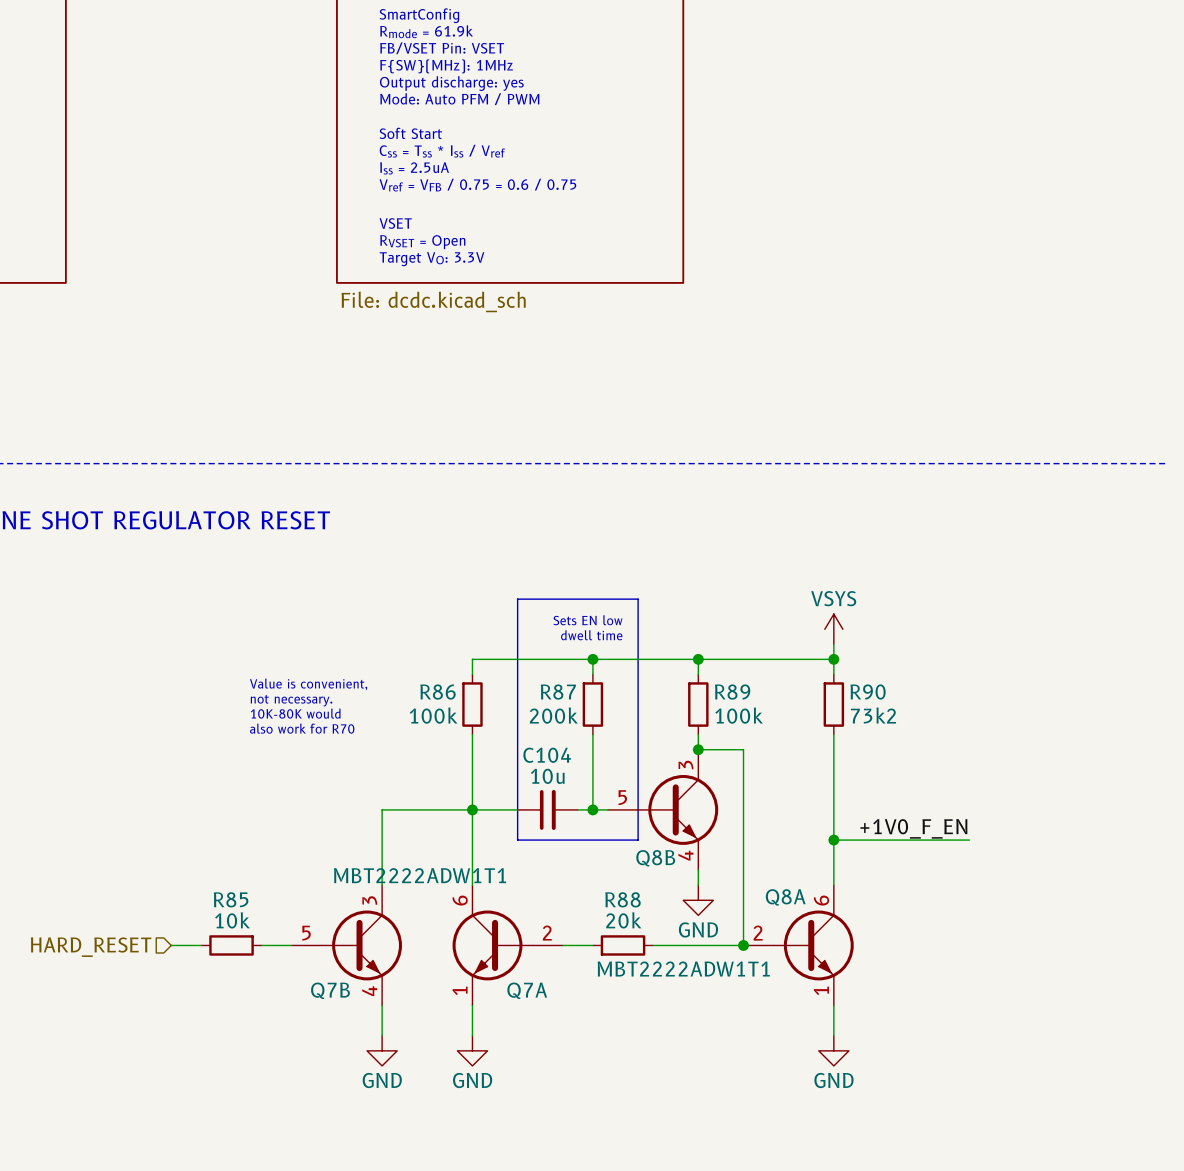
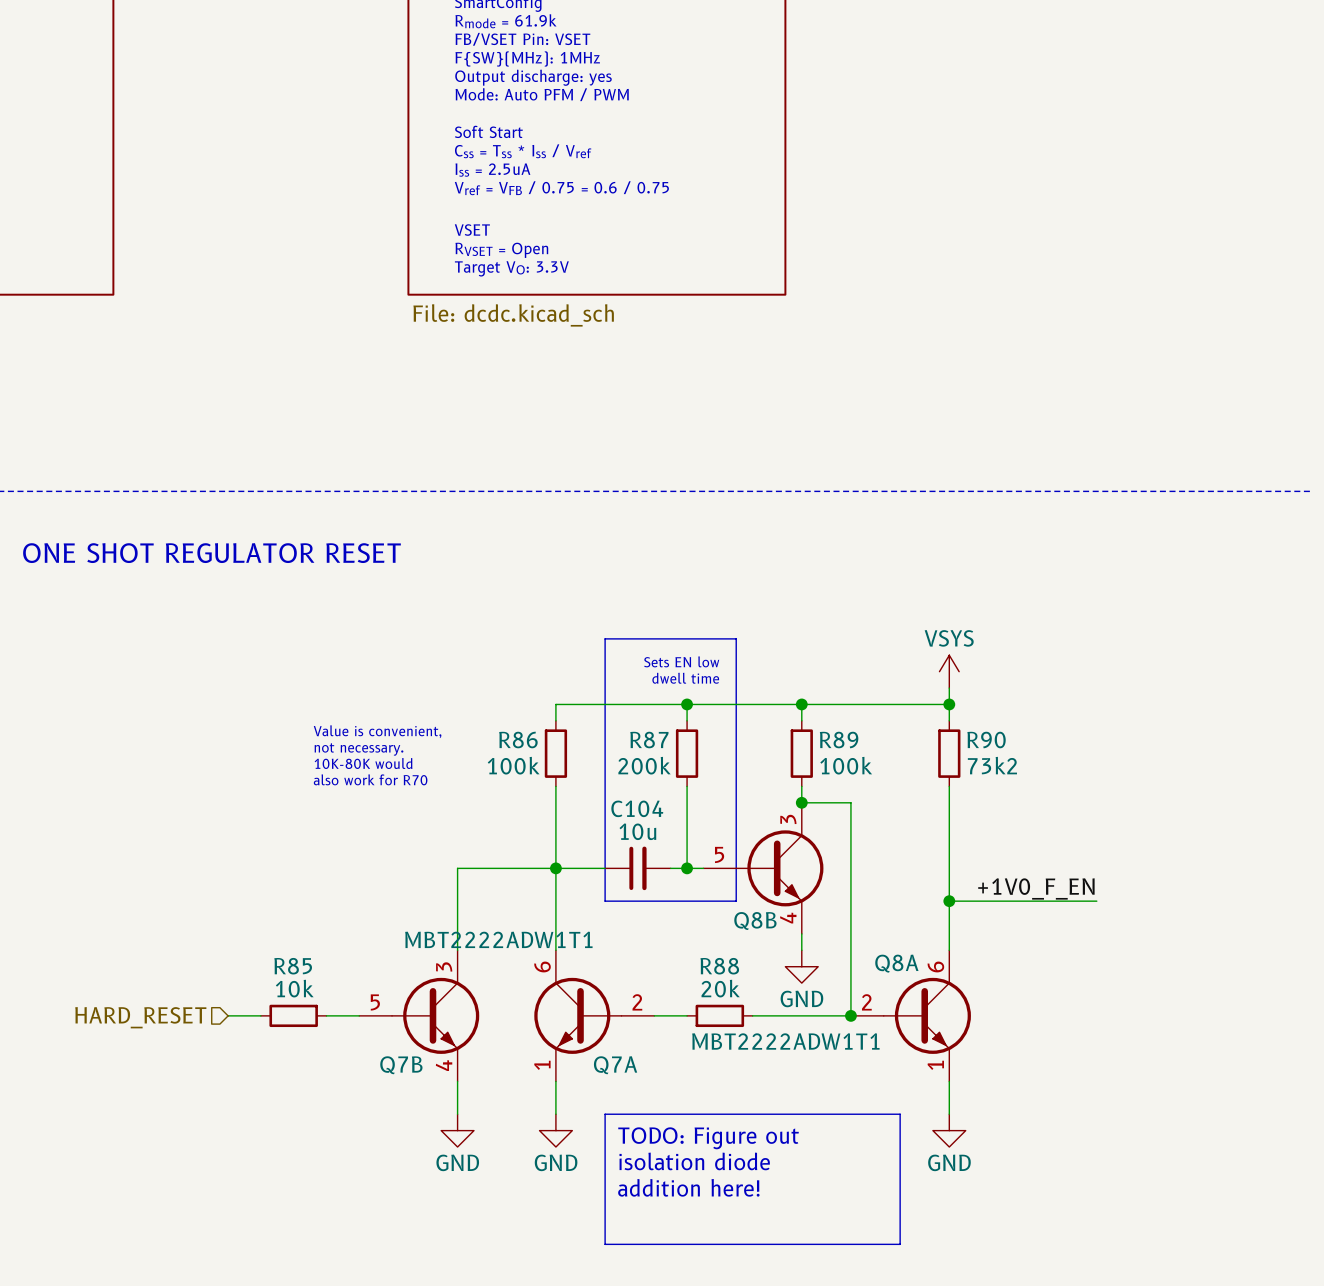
line: none -> (605, 1114) (900, 1114) (900, 1244) (605, 1244) (605, 1114)
text: none -> TODO: Figure out (708, 1138)
text: none -> isolation diode (694, 1161)
text: none -> addition here! (688, 1187)

